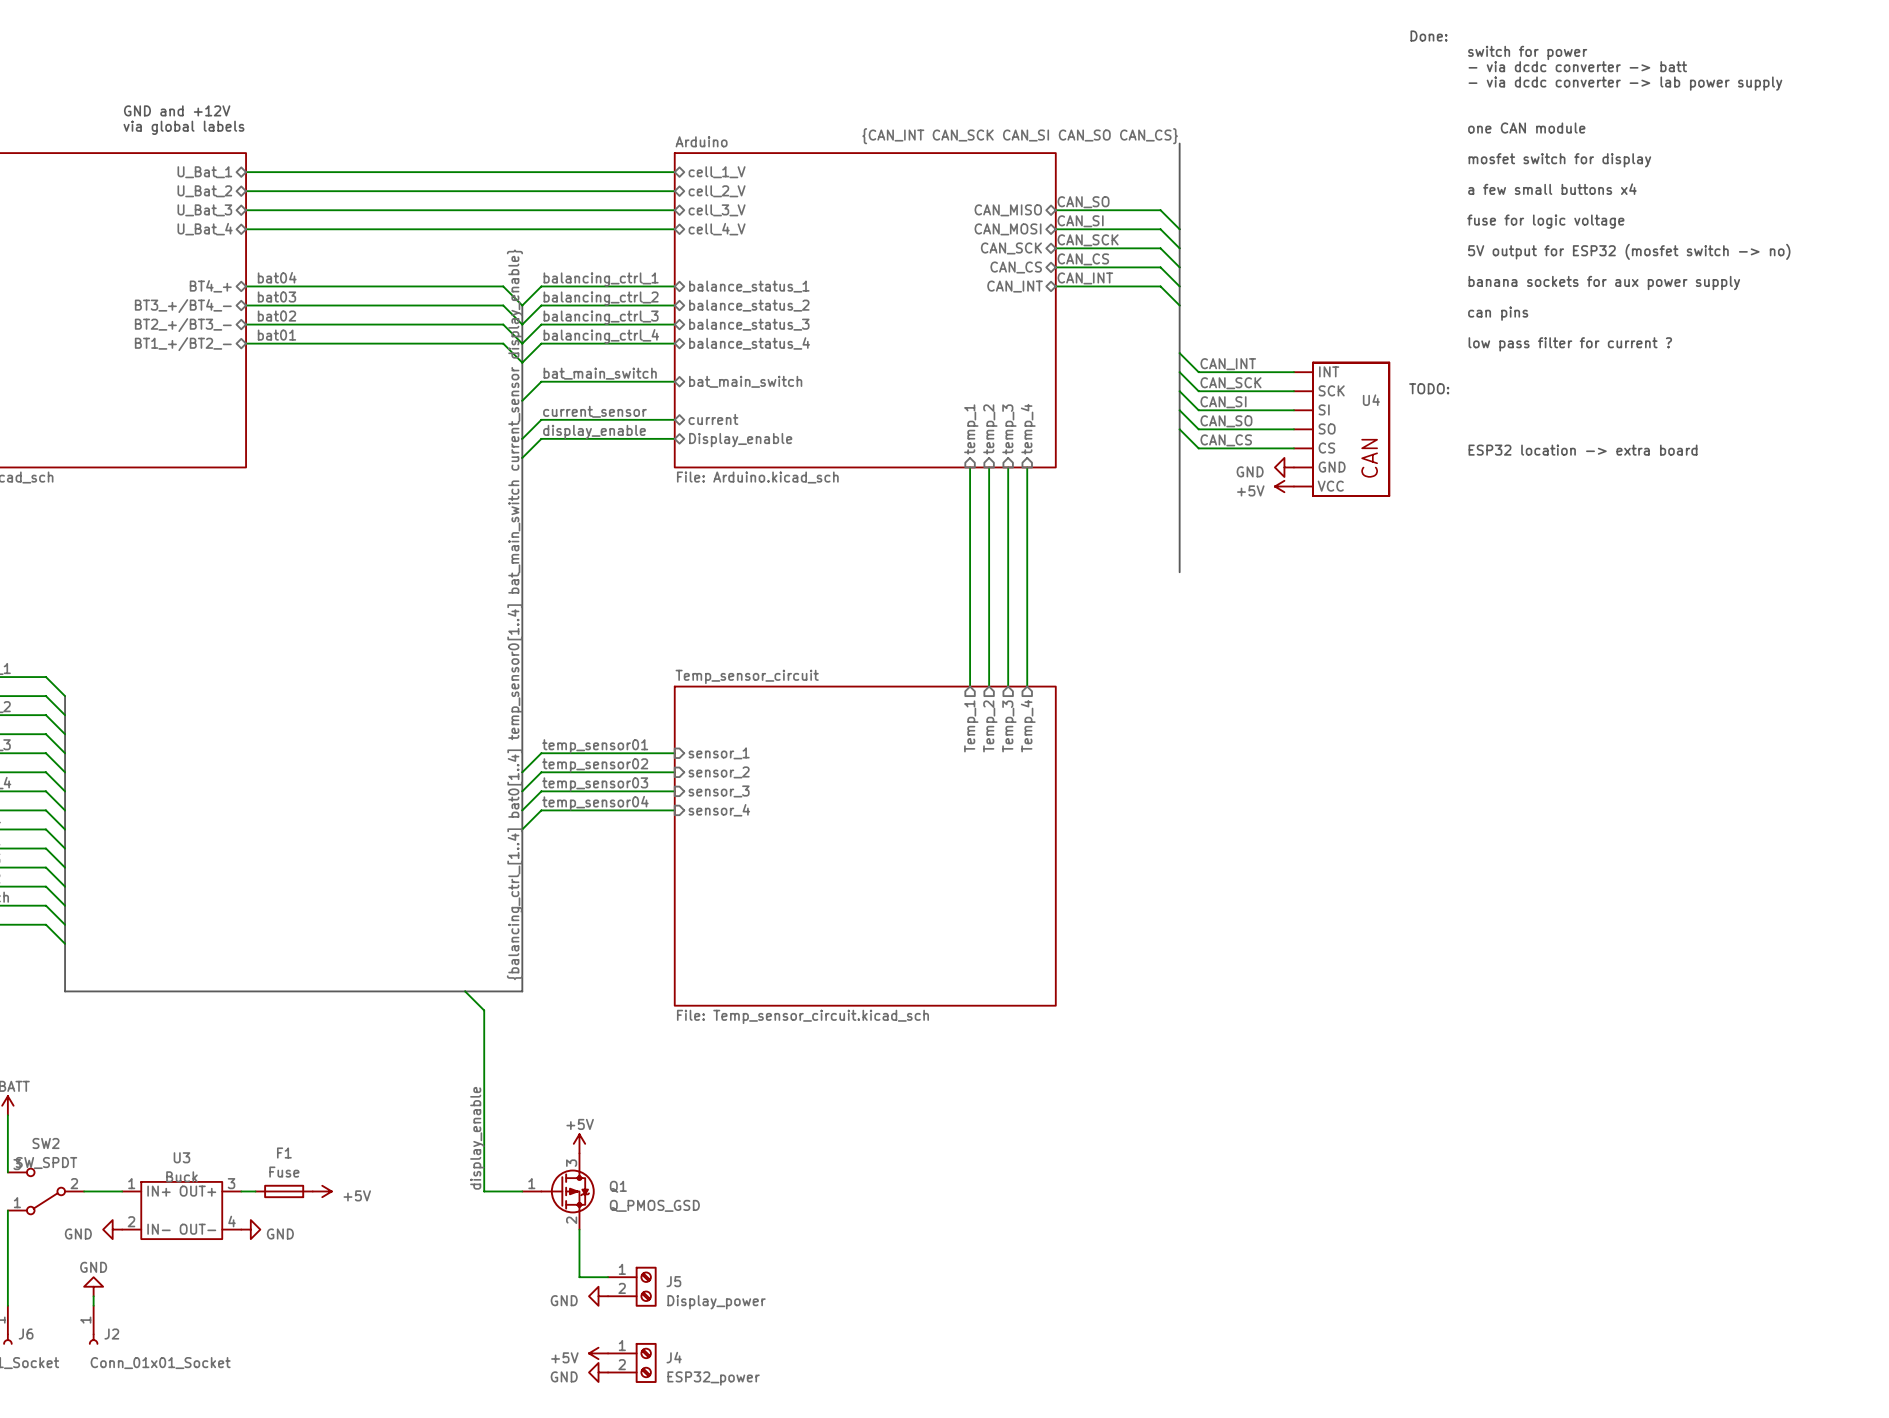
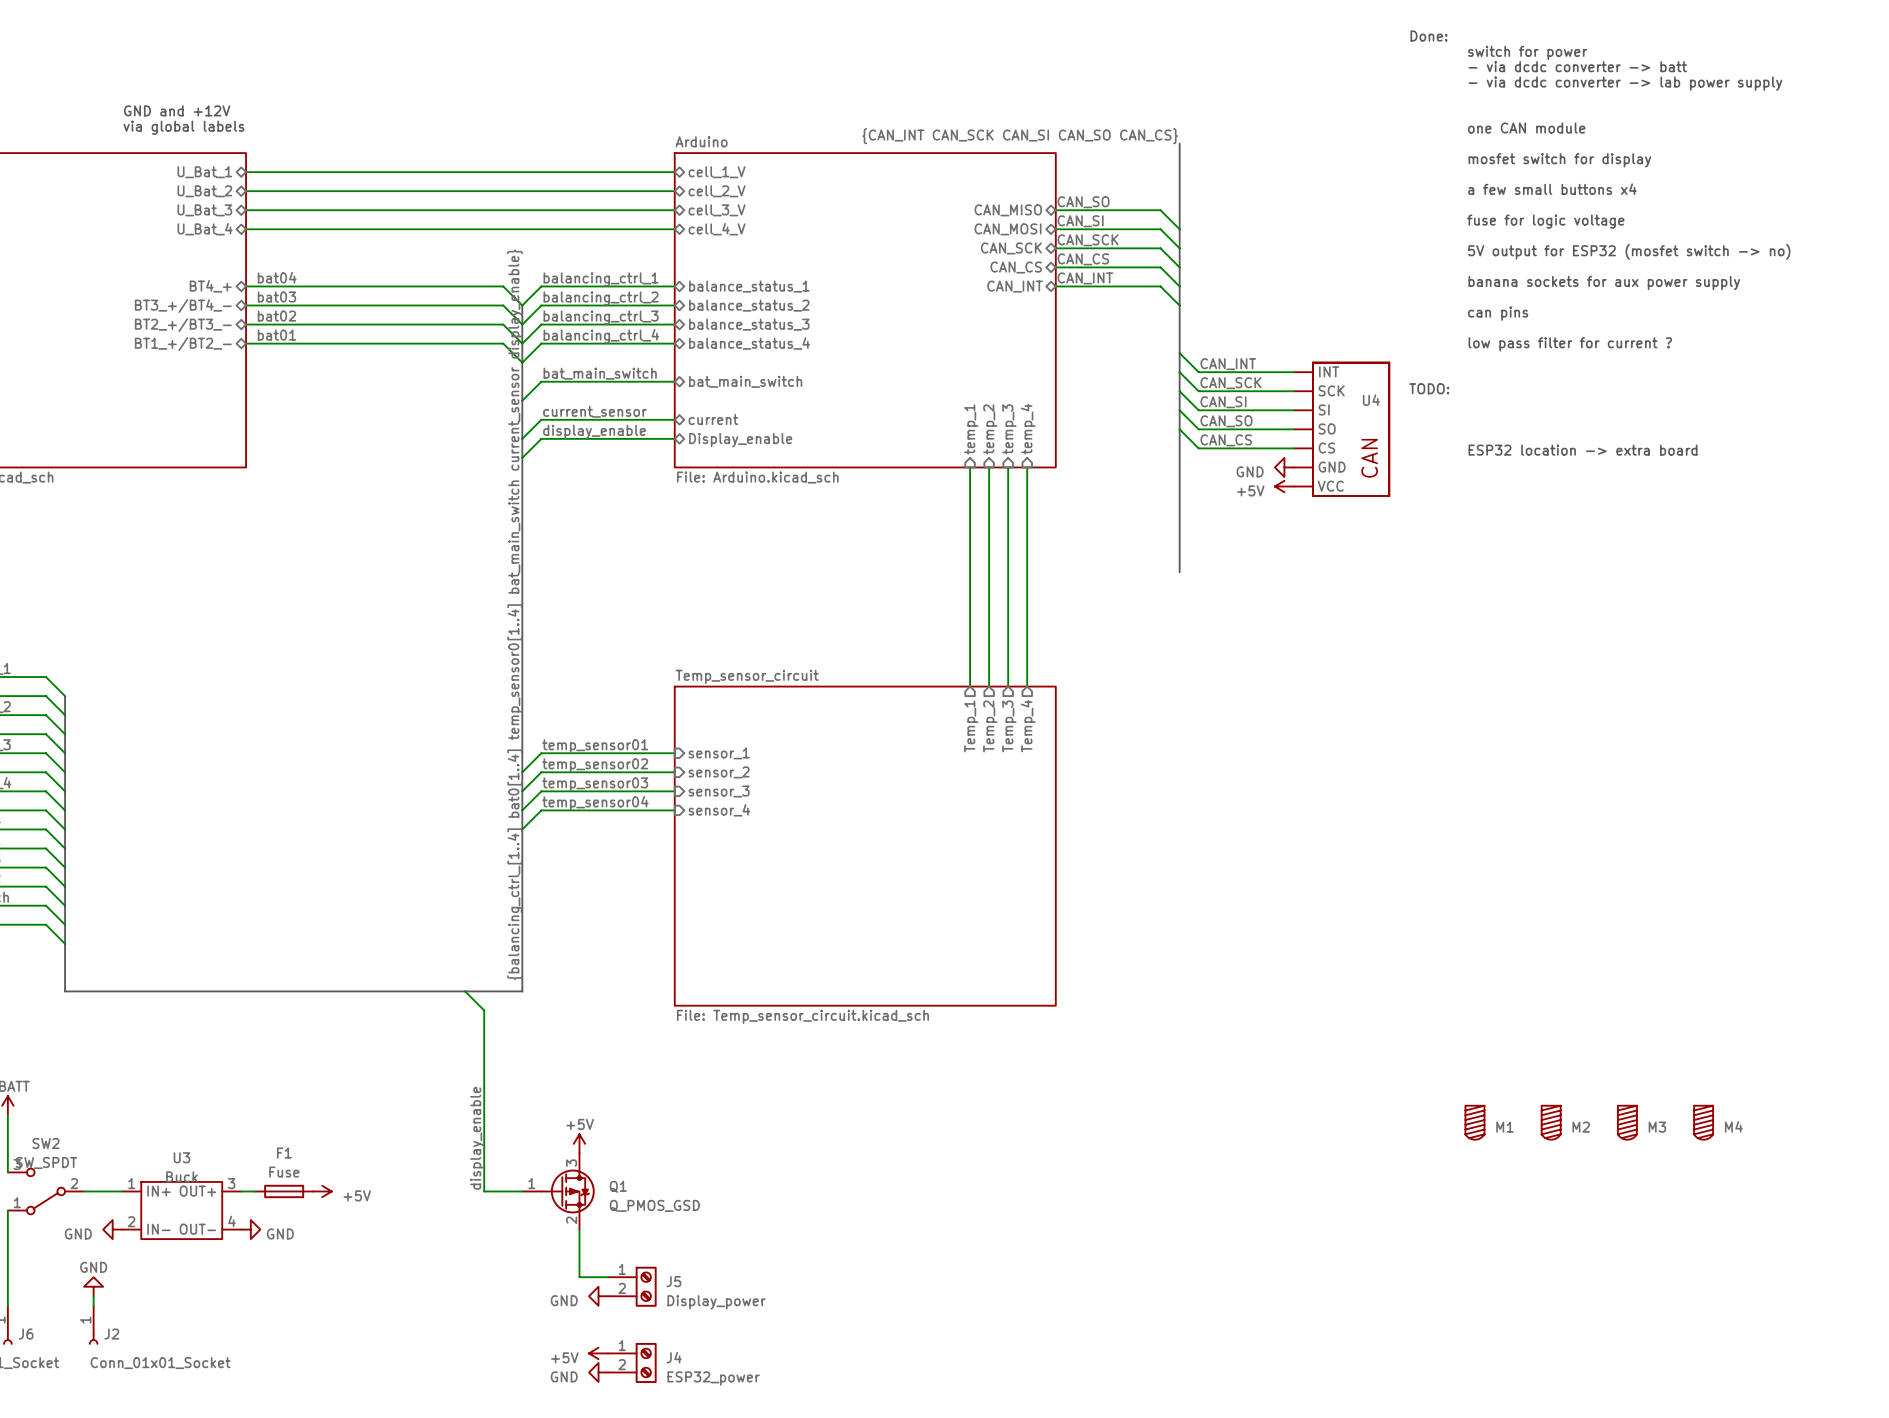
M1: none -> (1474, 1122)
M2: none -> (1551, 1122)
M3: none -> (1627, 1122)
M4: none -> (1703, 1122)

